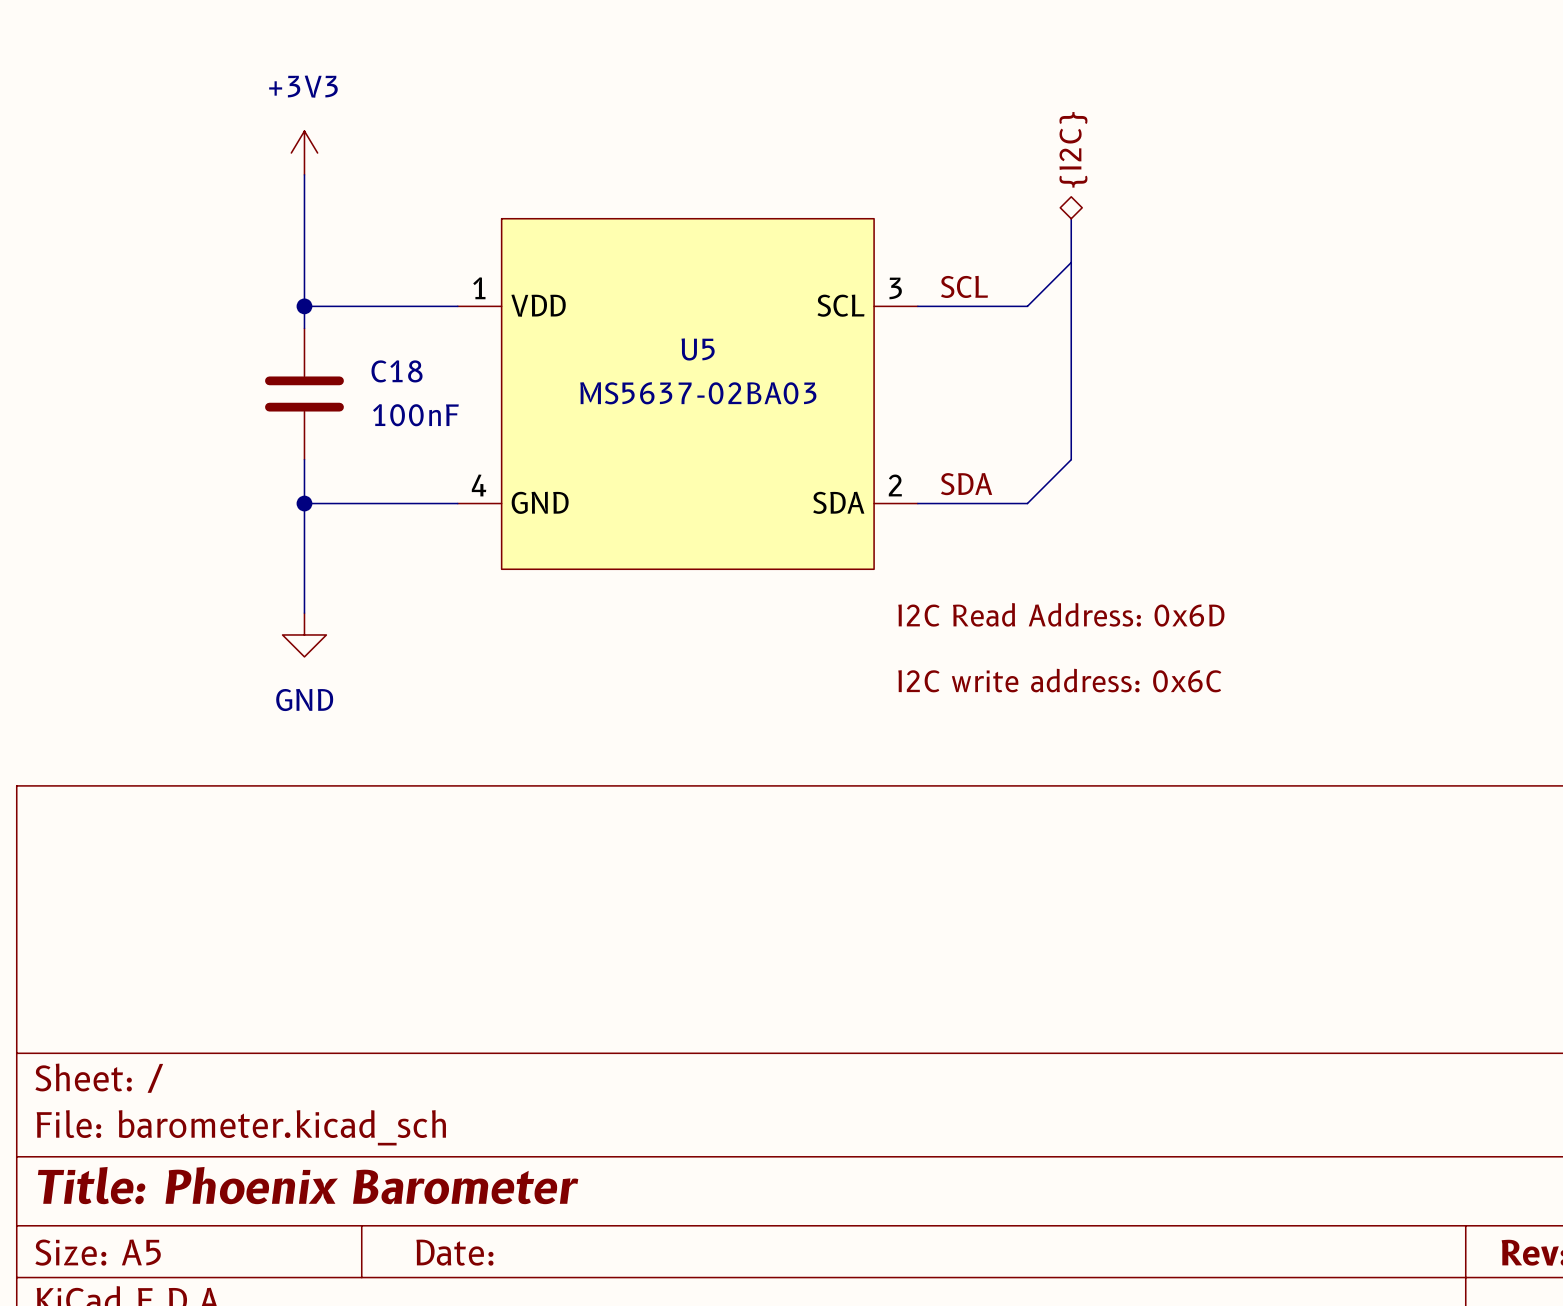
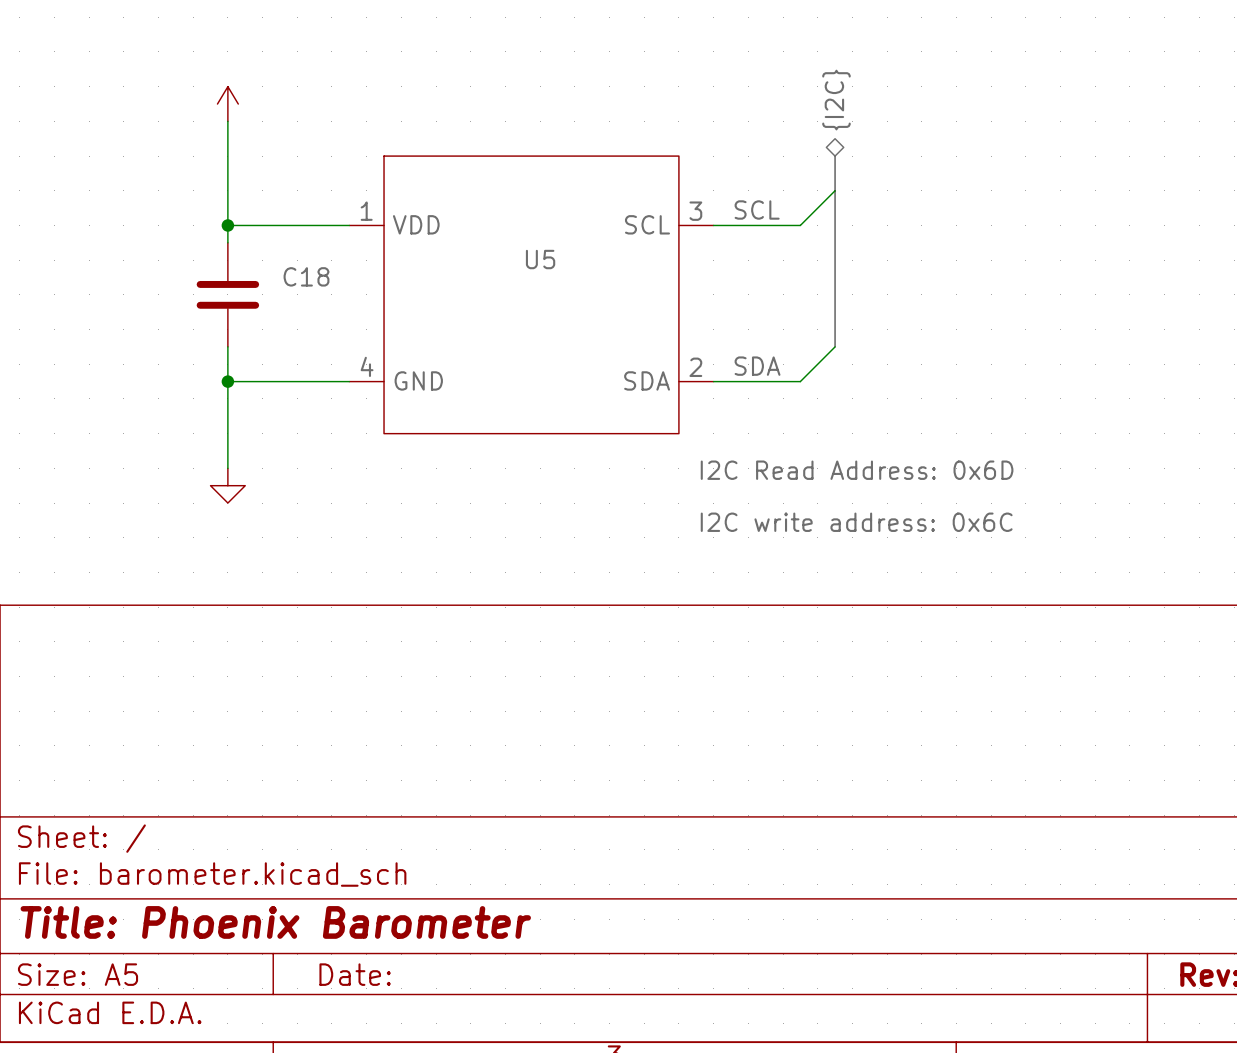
power symbol text: +3V3 (303, 86) -> none
U5 value: MS5637-02BA03 (698, 393) -> none
C18 value: 100nF (415, 415) -> none
power symbol text: GND (304, 700) -> none

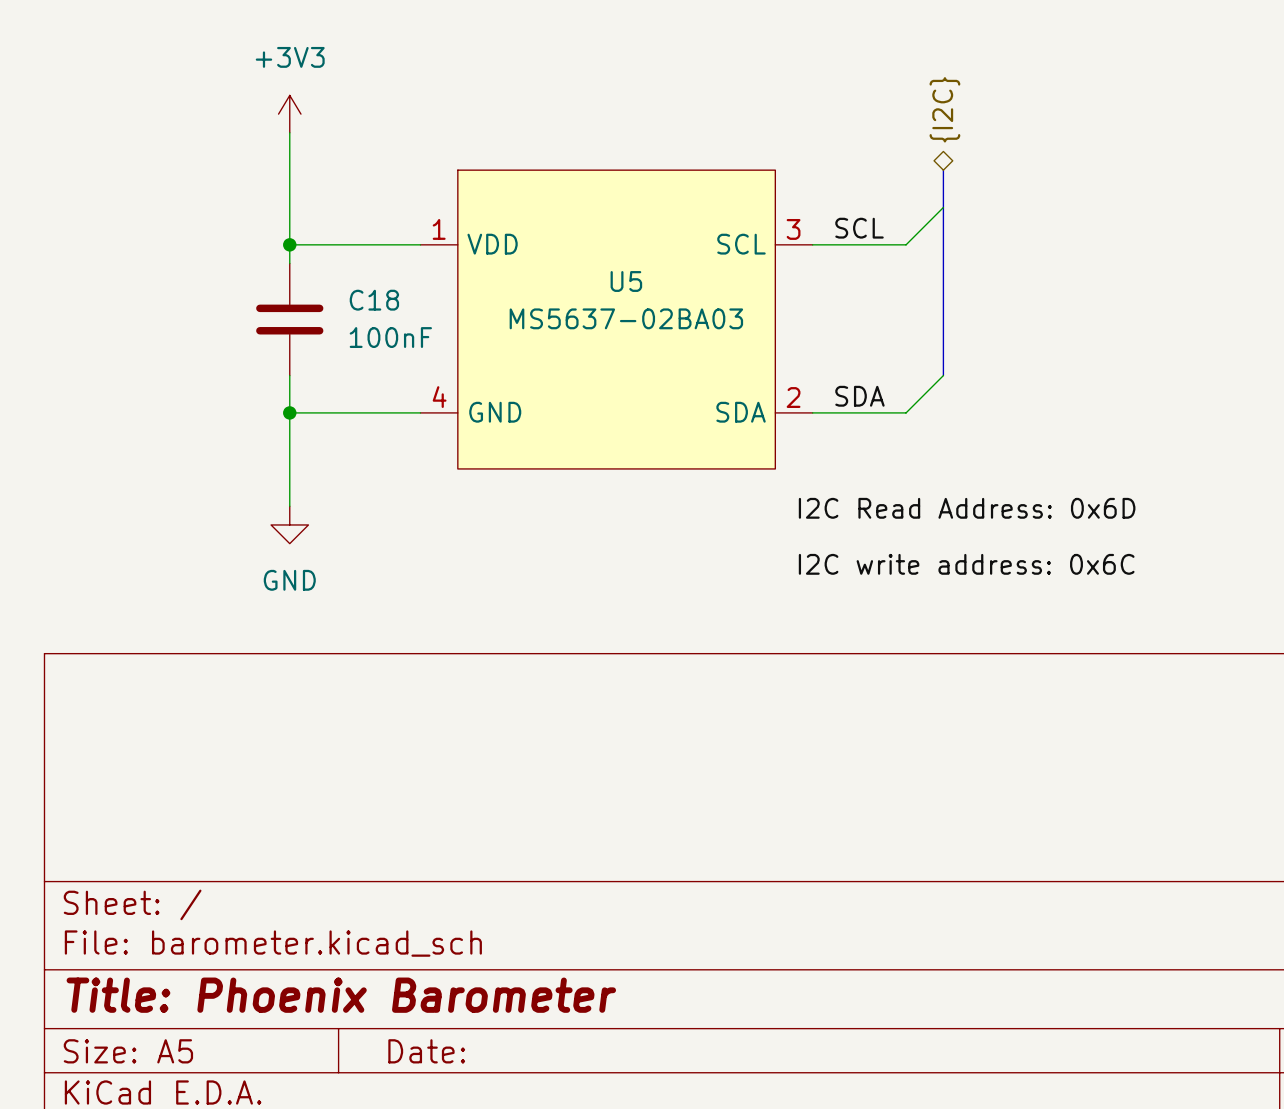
power symbol text: none -> +3V3 (290, 57)
U5 value: none -> MS5637-02BA03 (626, 318)
C18 value: none -> 100nF (390, 337)
power symbol text: none -> GND (289, 580)

